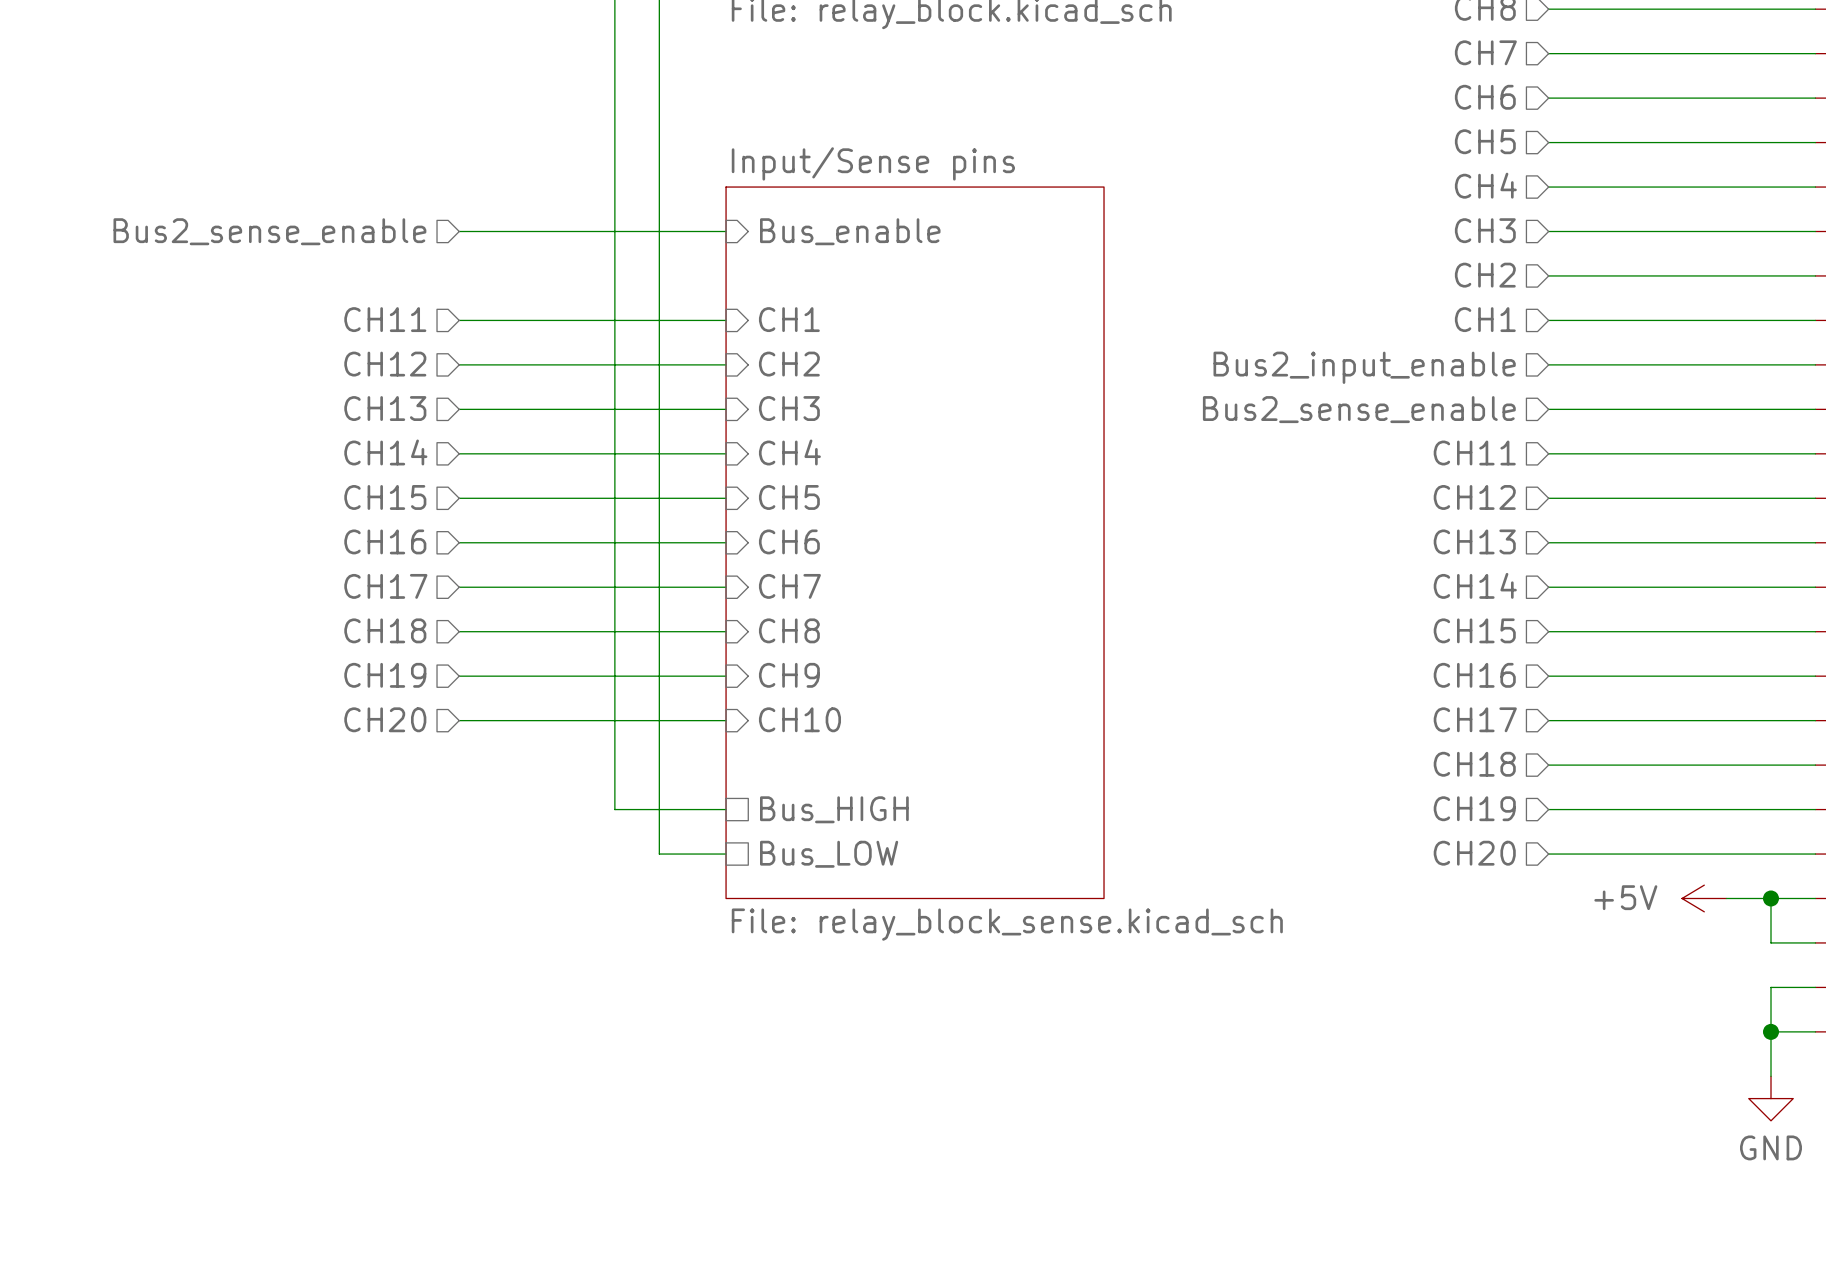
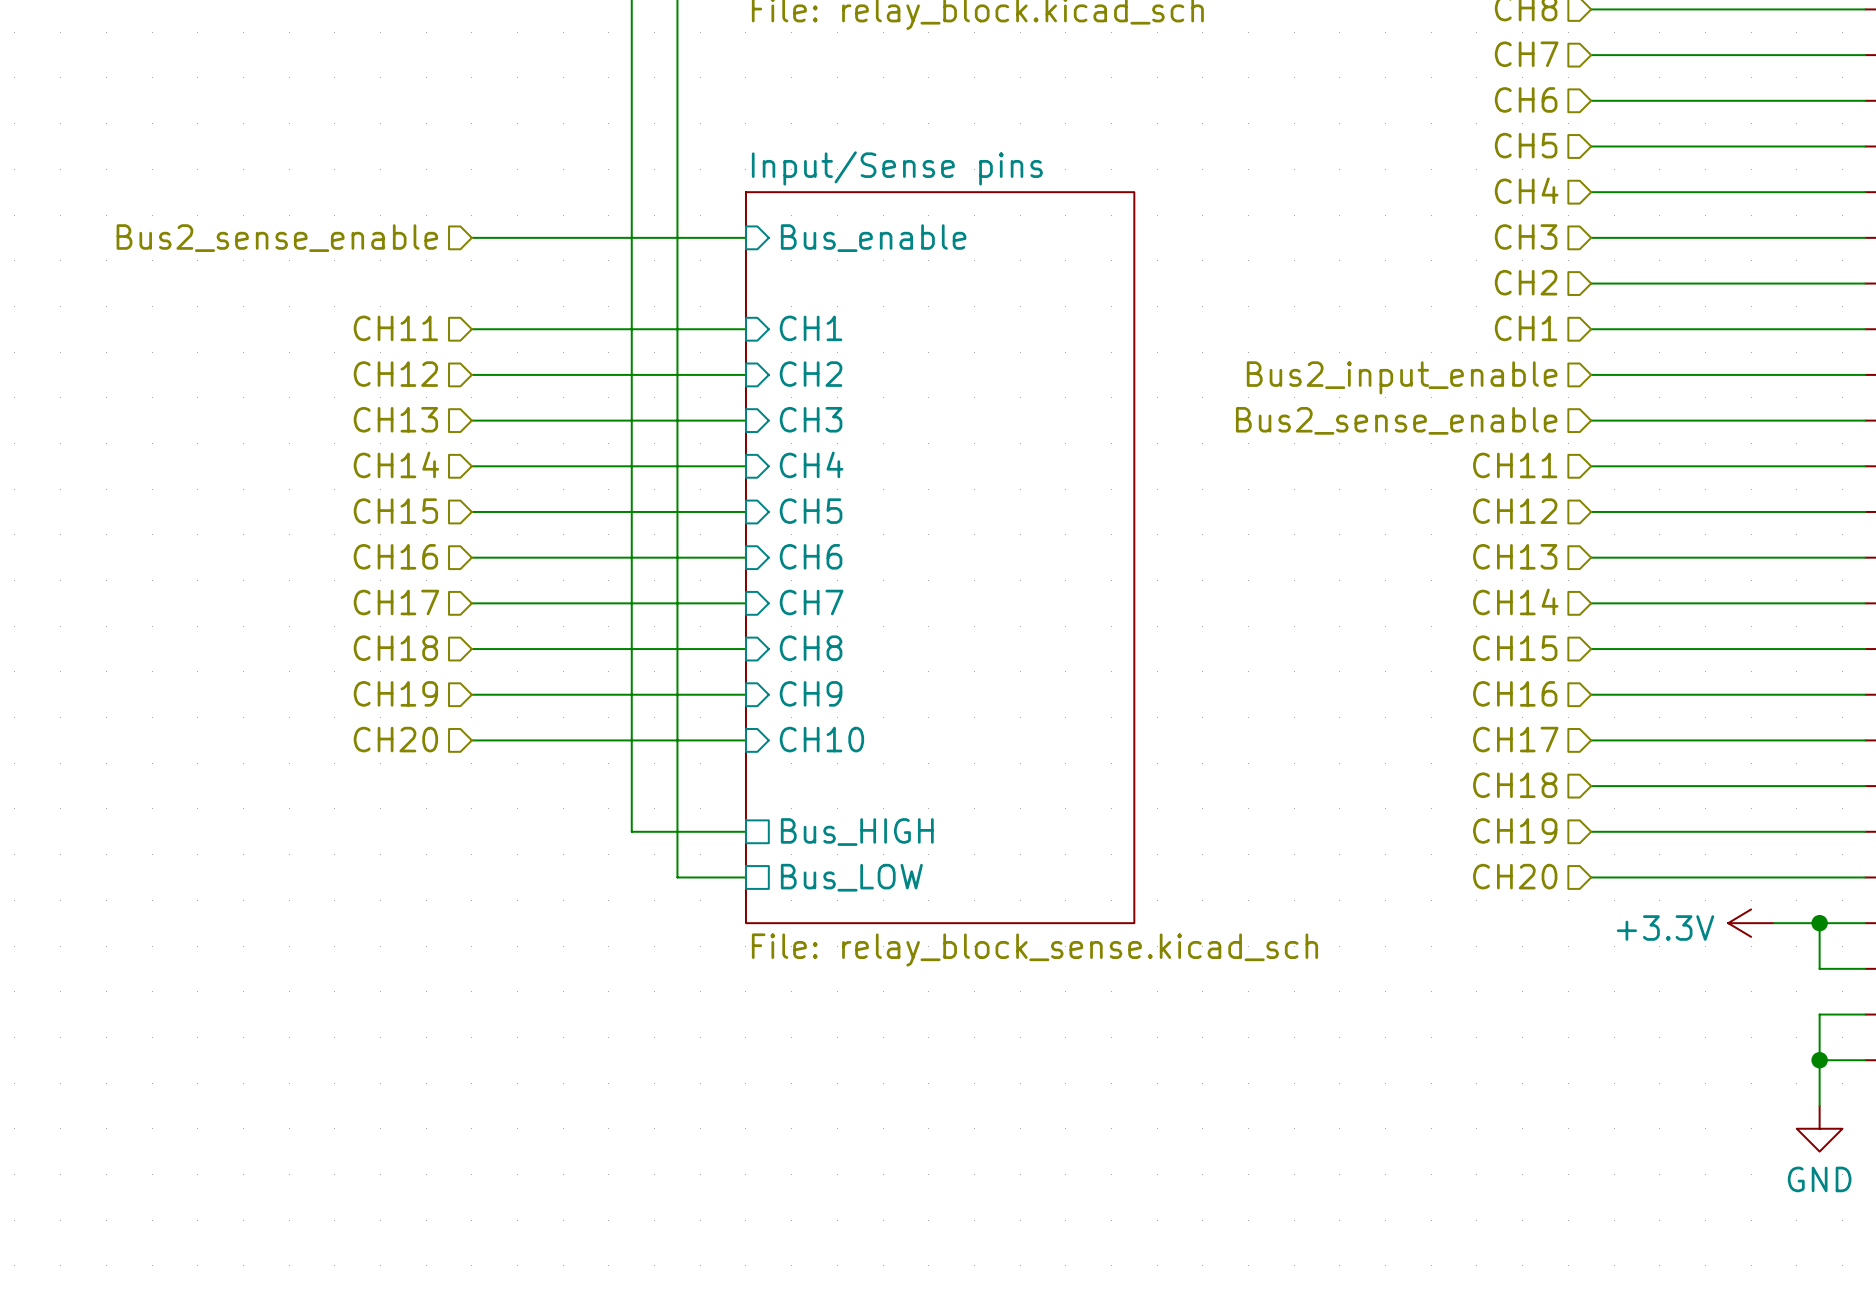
power symbol: +5V (1704, 898) -> +3.3V (1751, 923)

